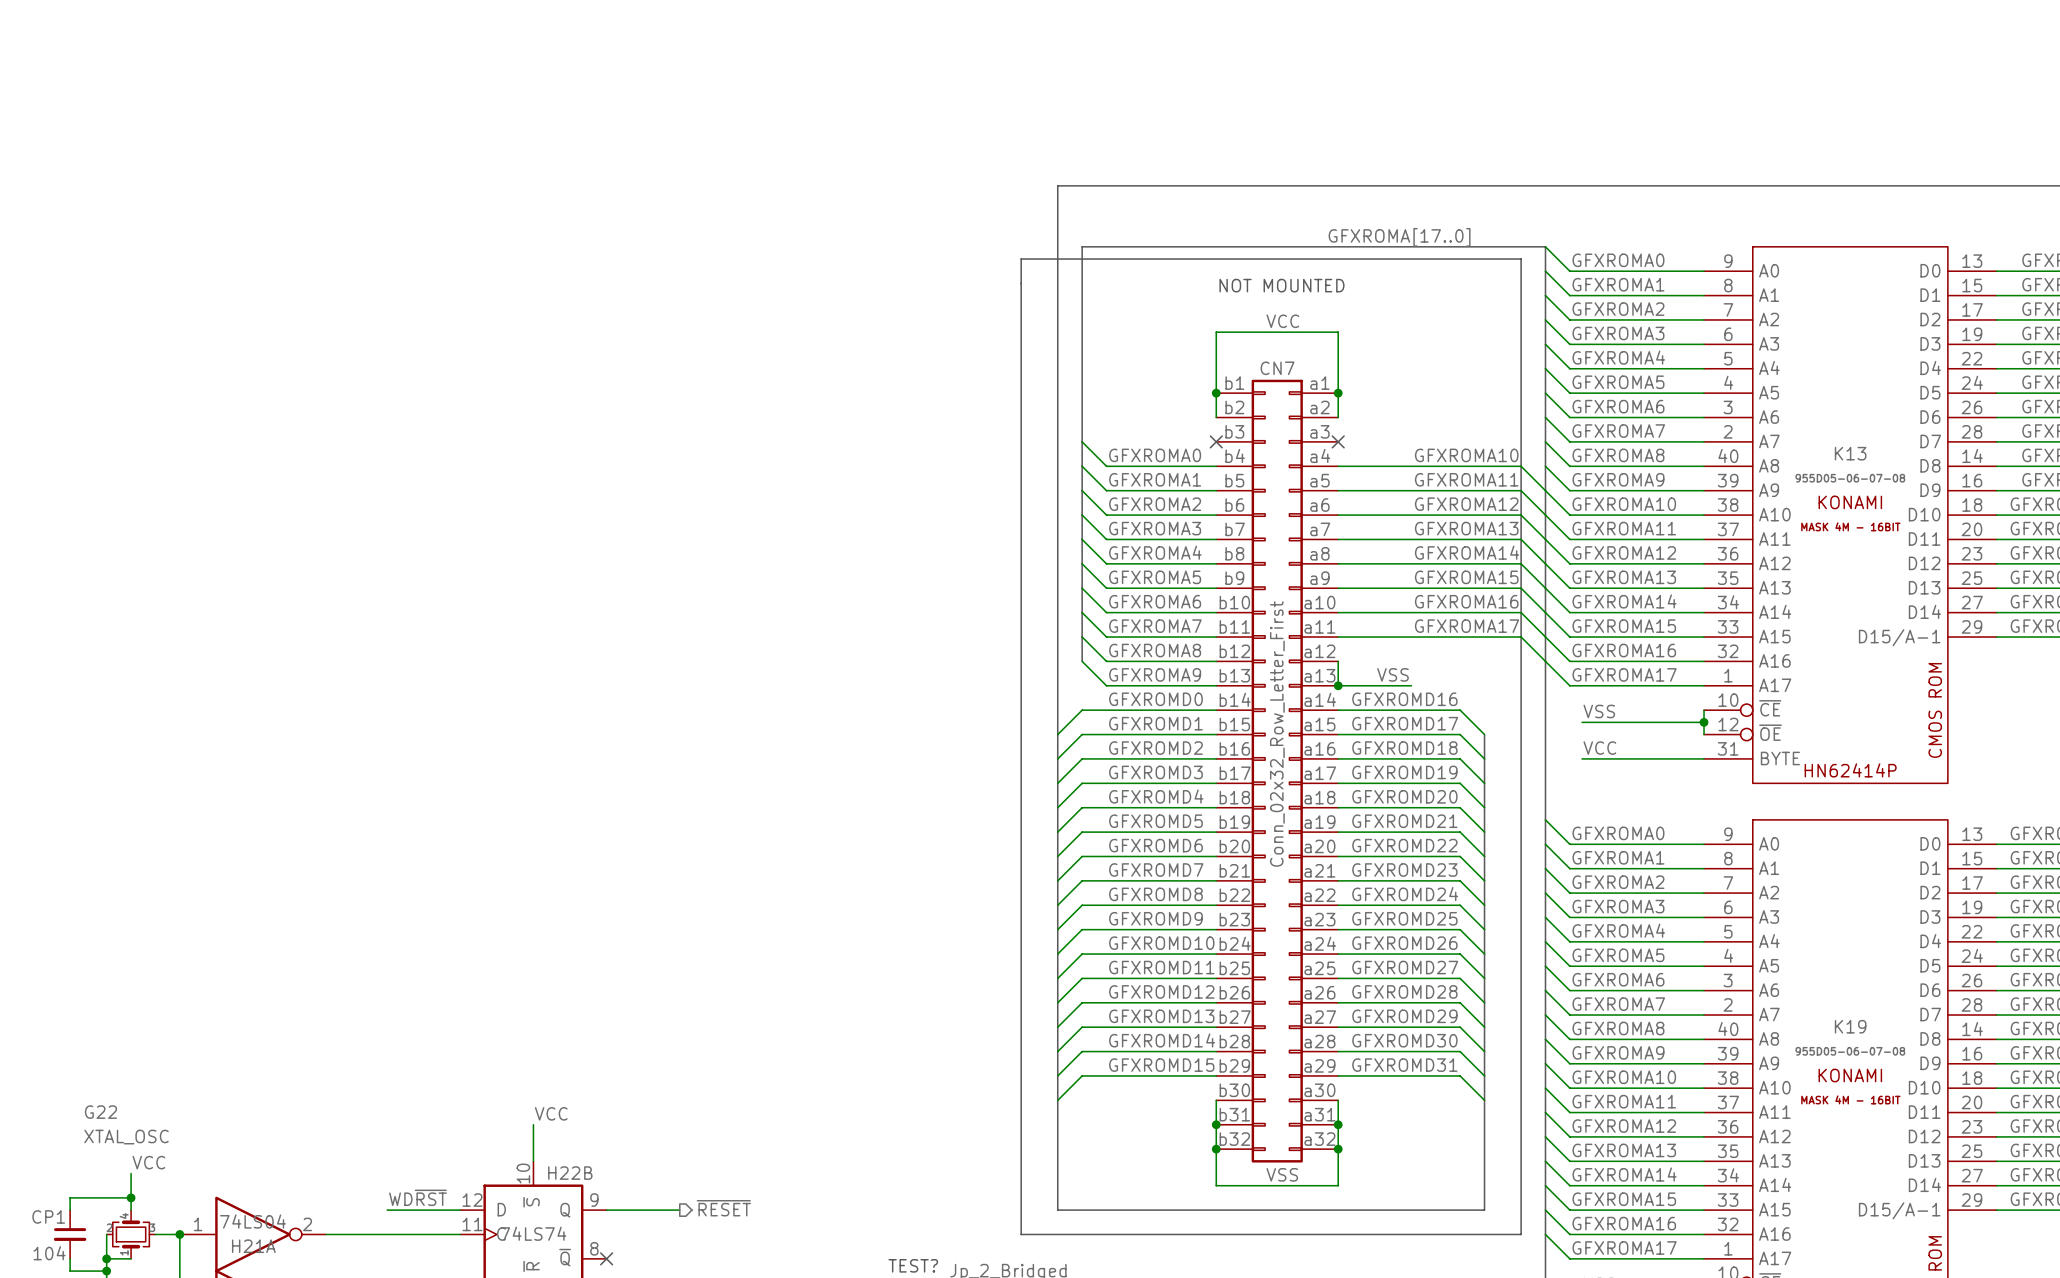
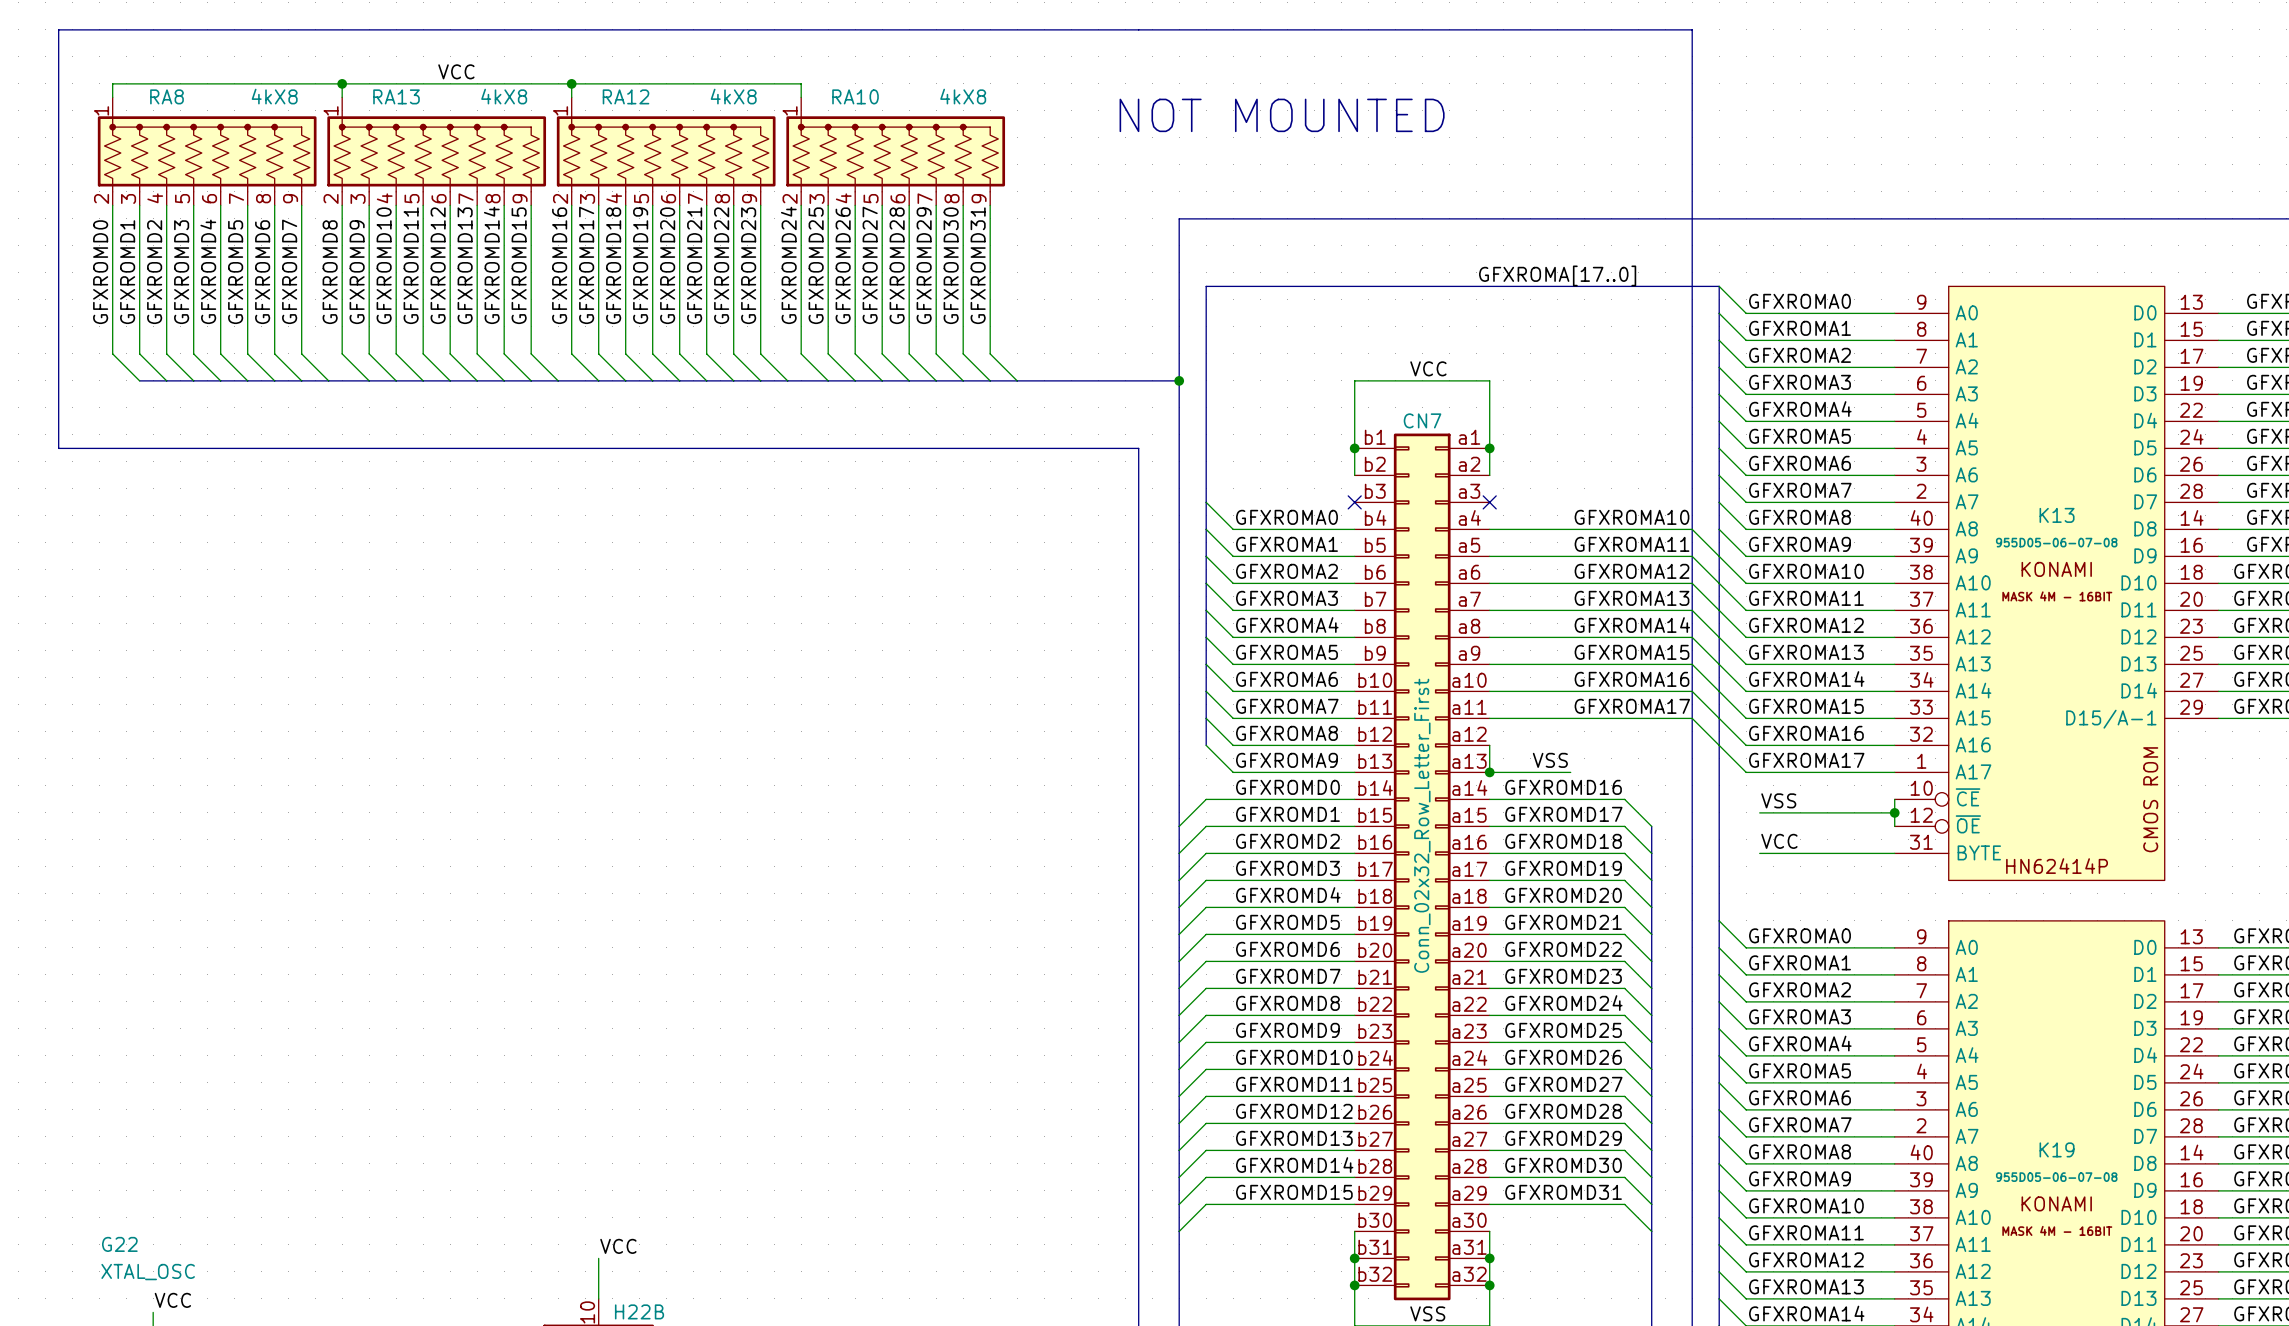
label: none -> VCC (456, 71)
wire: none -> (342, 83) (342, 97)
junction: none -> (342, 83)
wire: none -> (571, 83) (571, 97)
junction: none -> (571, 83)
wire: none -> (112, 97) (112, 83) (801, 83) (801, 97)
text: none -> NOT MOUNTED (1282, 115)
RA8: none -> 4kX8 (207, 151)
RA13: none -> 4kX8 (436, 151)
RA12: none -> 4kX8 (666, 151)
RA10: none -> 4kX8 (895, 151)
wire: none -> (112, 205) (112, 353) (139, 380)
wire: none -> (139, 205) (139, 353) (166, 380)
wire: none -> (166, 205) (166, 353) (193, 380)
wire: none -> (193, 205) (193, 353) (220, 380)
wire: none -> (220, 205) (220, 353) (247, 380)
wire: none -> (247, 205) (247, 353) (274, 380)
wire: none -> (274, 205) (274, 353) (301, 380)
wire: none -> (301, 205) (301, 353) (328, 380)
wire: none -> (342, 205) (342, 353) (369, 380)
wire: none -> (369, 205) (369, 353) (396, 380)
wire: none -> (396, 205) (396, 353) (423, 380)
wire: none -> (423, 205) (423, 353) (450, 380)
wire: none -> (450, 205) (450, 353) (477, 380)
wire: none -> (477, 205) (477, 353) (504, 380)
wire: none -> (504, 205) (504, 353) (531, 380)
wire: none -> (531, 205) (531, 353) (558, 380)
wire: none -> (571, 205) (571, 353) (598, 380)
wire: none -> (598, 205) (598, 353) (625, 380)
wire: none -> (625, 205) (625, 353) (652, 380)
wire: none -> (652, 205) (652, 353) (679, 380)
wire: none -> (679, 205) (679, 353) (706, 380)
wire: none -> (706, 205) (706, 353) (733, 380)
wire: none -> (733, 205) (733, 353) (760, 380)
wire: none -> (760, 205) (760, 353) (787, 380)
wire: none -> (801, 205) (801, 353) (828, 380)
wire: none -> (828, 205) (828, 353) (855, 380)
wire: none -> (855, 205) (855, 353) (882, 380)
wire: none -> (882, 205) (882, 353) (909, 380)
wire: none -> (909, 205) (909, 353) (936, 380)
wire: none -> (936, 205) (936, 353) (963, 380)
wire: none -> (963, 205) (963, 353) (990, 380)
wire: none -> (990, 205) (990, 353) (1017, 380)
label: none -> GFXROMD14 (491, 265)
label: none -> GFXROMD17 (586, 265)
label: none -> GFXROMD24 (788, 265)
label: none -> GFXROMD27 (870, 265)
label: none -> GFXROMD10 (384, 265)
label: none -> GFXROMD11 (411, 265)
label: none -> GFXROMD12 (438, 265)
label: none -> GFXROMD13 (465, 265)
label: none -> GFXROMD15 (519, 265)
label: none -> GFXROMD16 (559, 265)
label: none -> GFXROMD18 (613, 265)
label: none -> GFXROMD19 (640, 265)
label: none -> GFXROMD20 (667, 265)
label: none -> GFXROMD21 (694, 265)
label: none -> GFXROMD22 (721, 265)
label: none -> GFXROMD23 (748, 265)
label: none -> GFXROMD25 (816, 265)
label: none -> GFXROMD26 (843, 265)
label: none -> GFXROMD28 (897, 265)
label: none -> GFXROMD29 (924, 265)
label: none -> GFXROMD30 (951, 265)
label: none -> GFXROMD31 (978, 265)
label: none -> GFXROMD0 (100, 272)
label: none -> GFXROMD1 (127, 272)
label: none -> GFXROMD2 (154, 272)
label: none -> GFXROMD3 (181, 272)
label: none -> GFXROMD4 (208, 271)
label: none -> GFXROMD5 (235, 272)
label: none -> GFXROMD6 (262, 272)
label: none -> GFXROMD7 (289, 271)
label: none -> GFXROMD8 (330, 272)
label: none -> GFXROMD9 (357, 272)
line: (1521, 259) (1021, 259) (1021, 393) -> (1692, 299) (1692, 29) (58, 29) (58, 448) (1138, 448)
text: NOT MOUNTED (1281, 285) -> none
bus: none -> (139, 380) (1179, 380)
junction: none -> (1179, 380)

